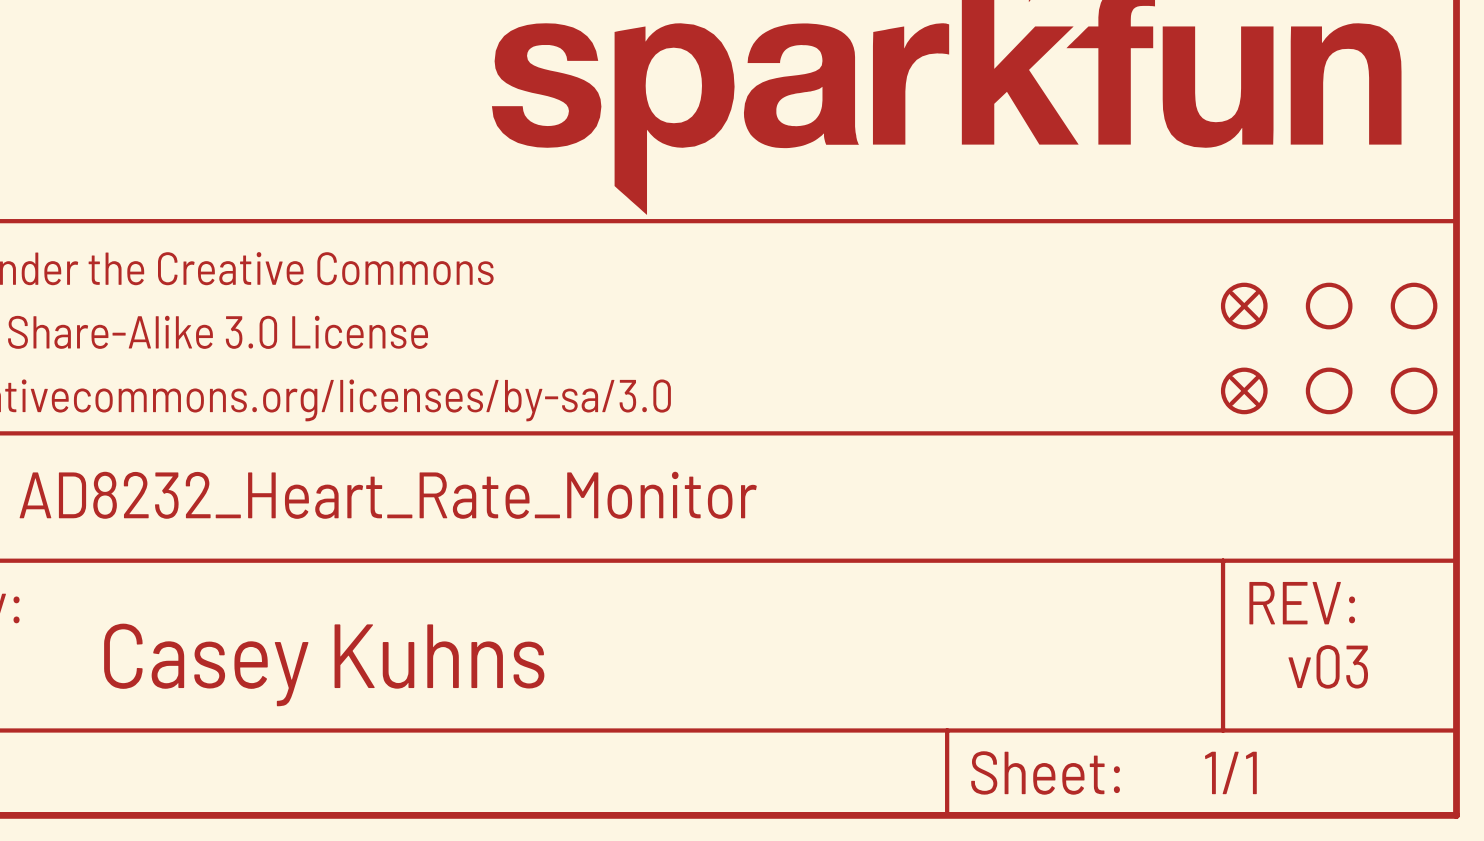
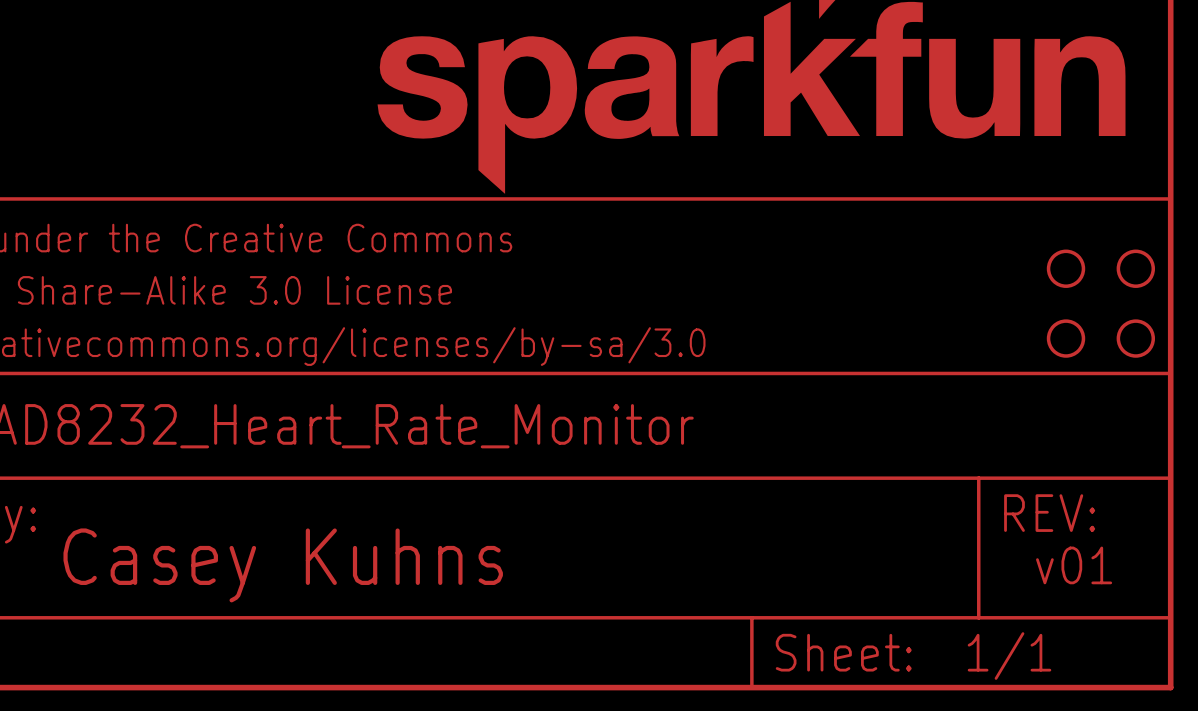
part: (1244, 306) -> none
part: (1244, 390) -> none
text: v03 (1328, 666) -> v01 (1074, 565)

